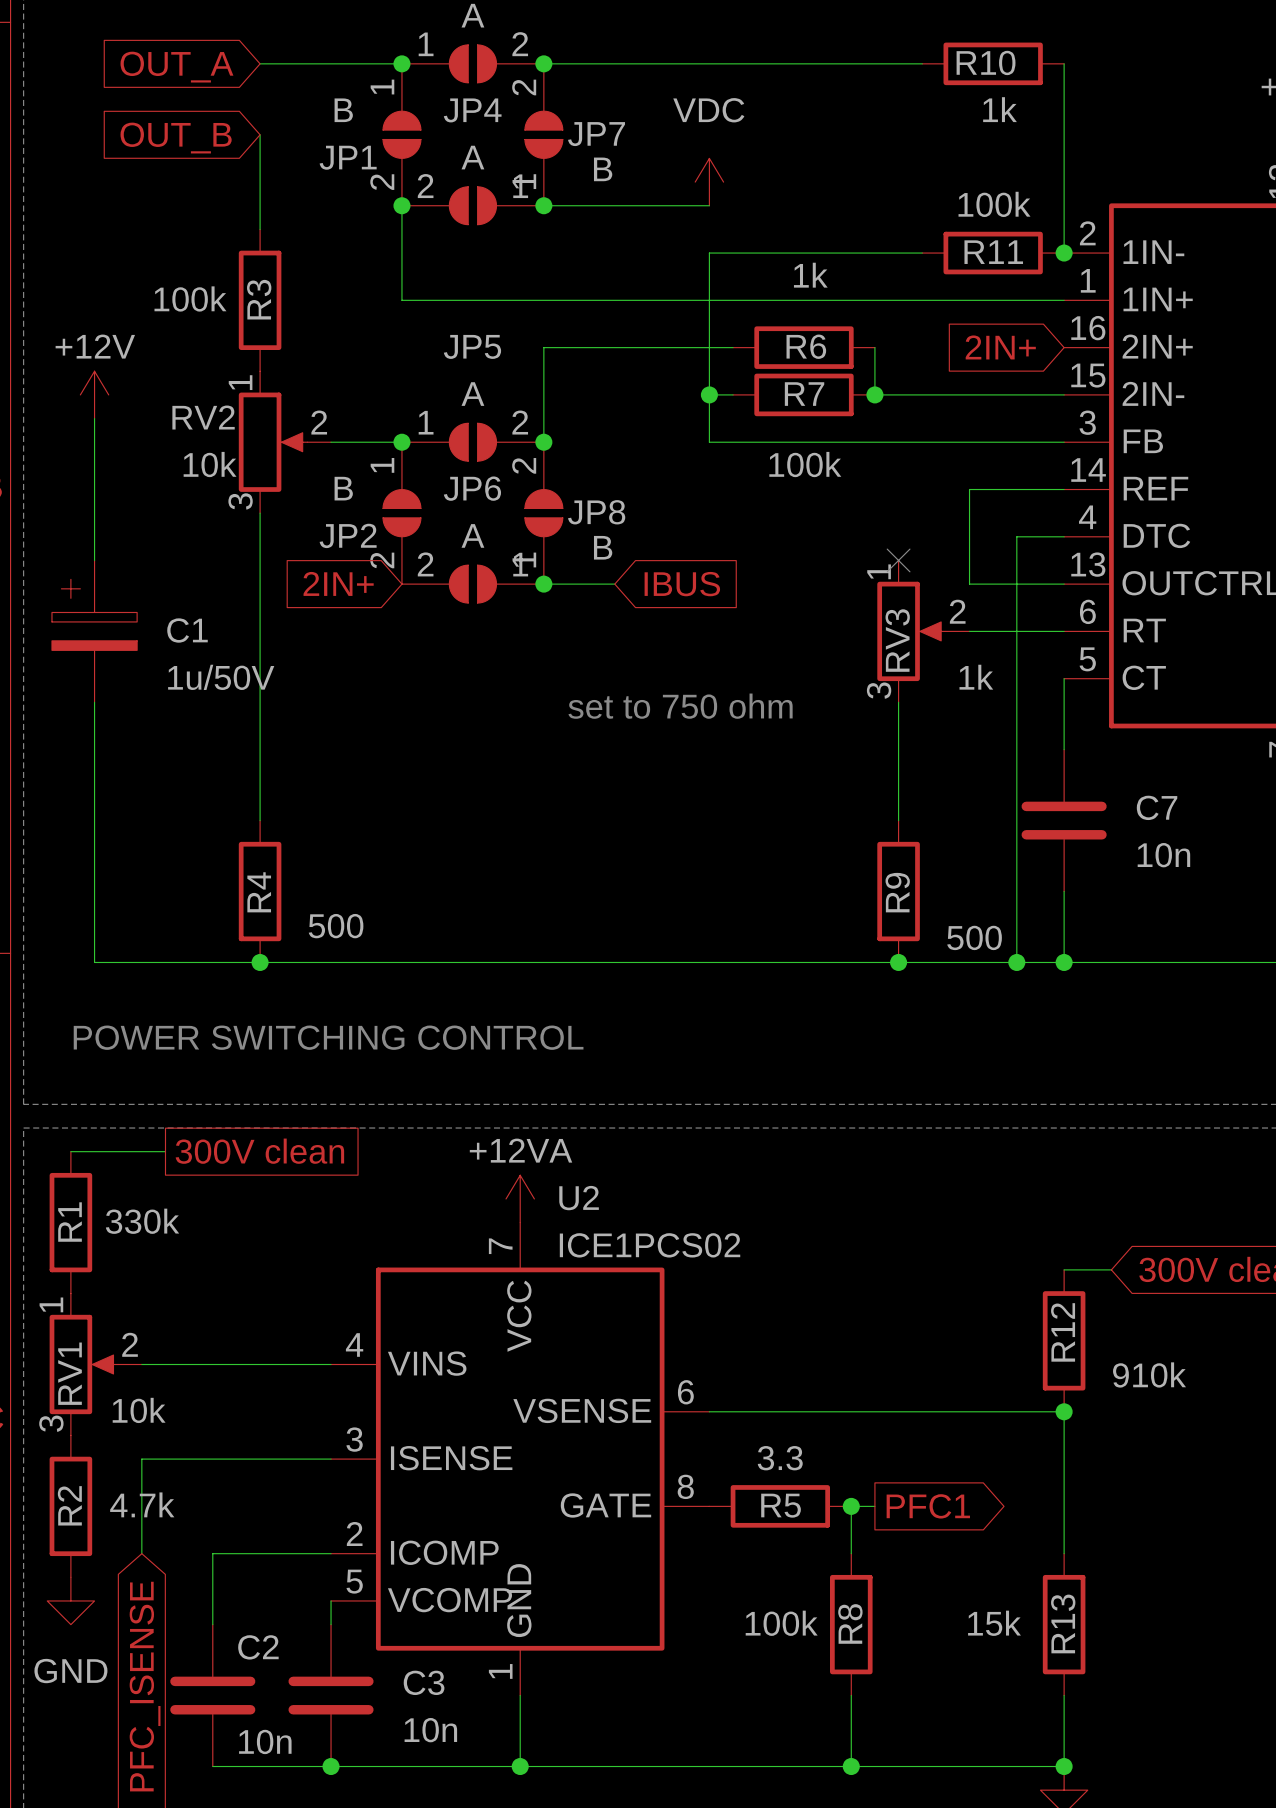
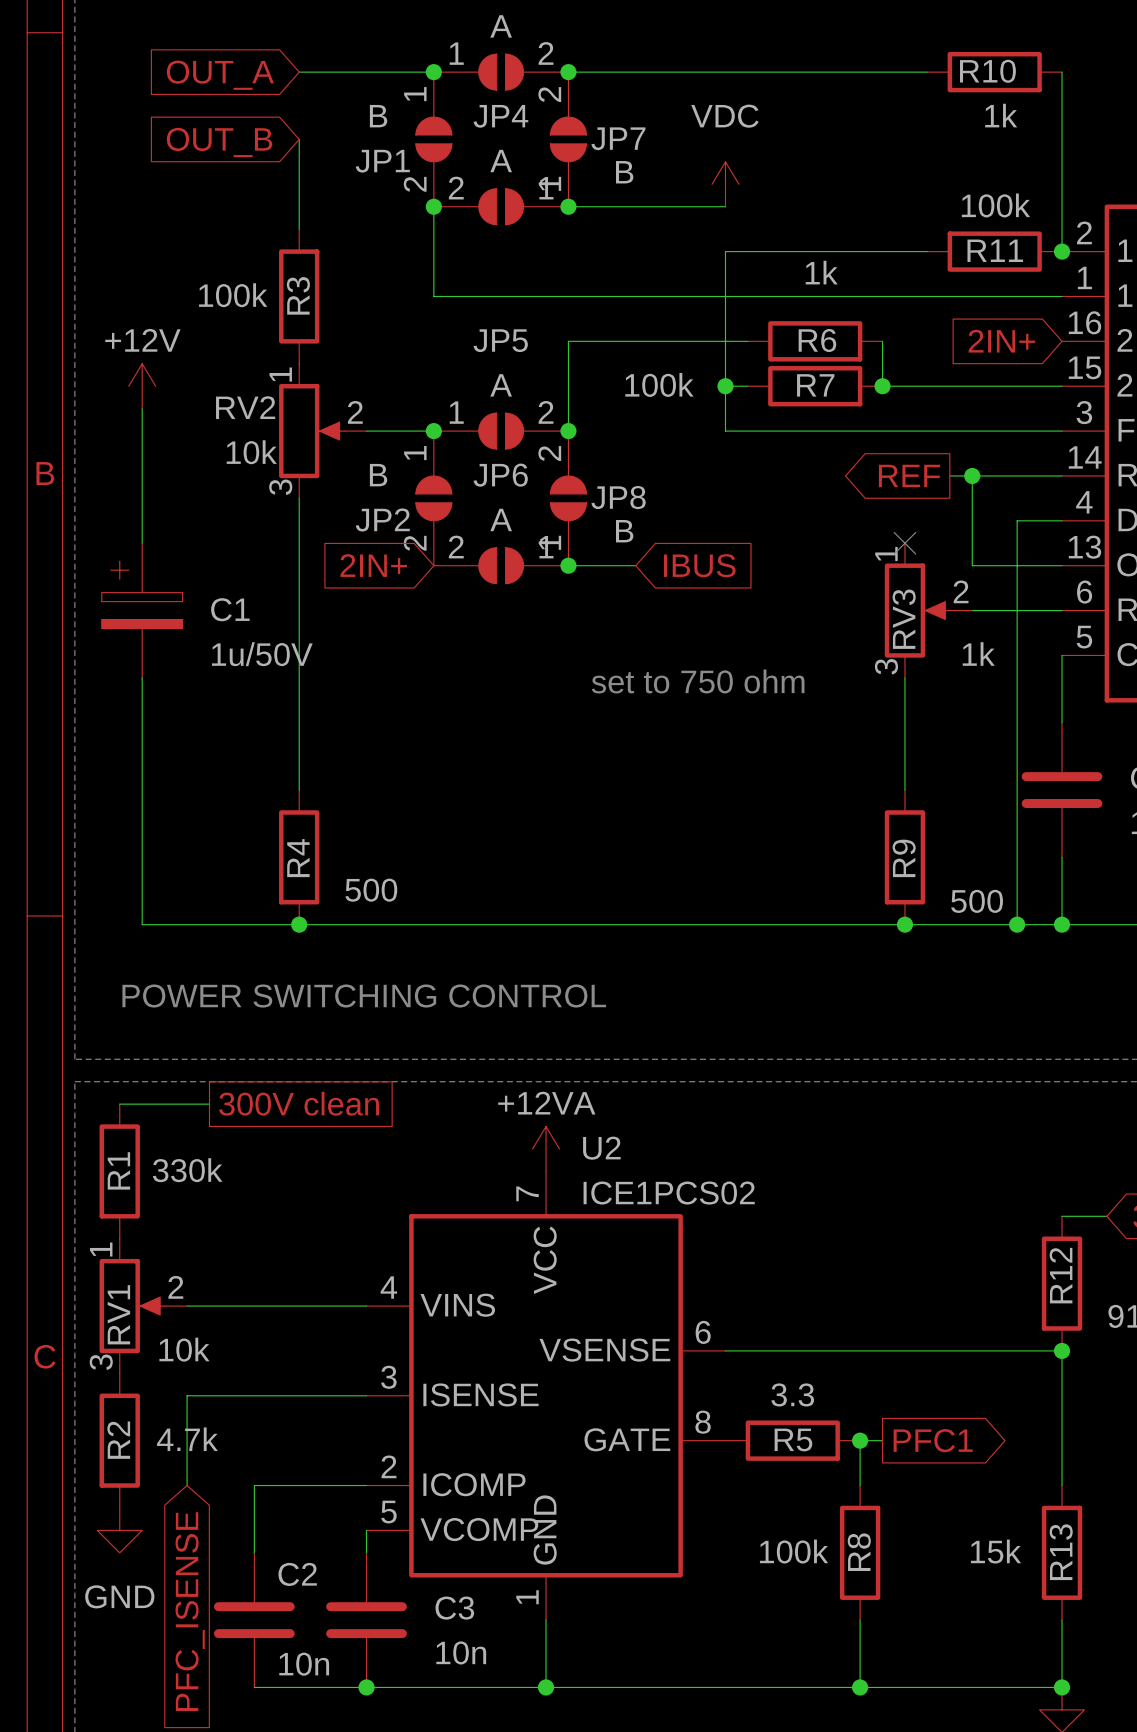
R7 value position: 100k (805, 464) -> 100k (659, 384)
global label: none -> REF (909, 475)
wire: none -> (949, 475) (972, 475)
junction: none -> (972, 475)

